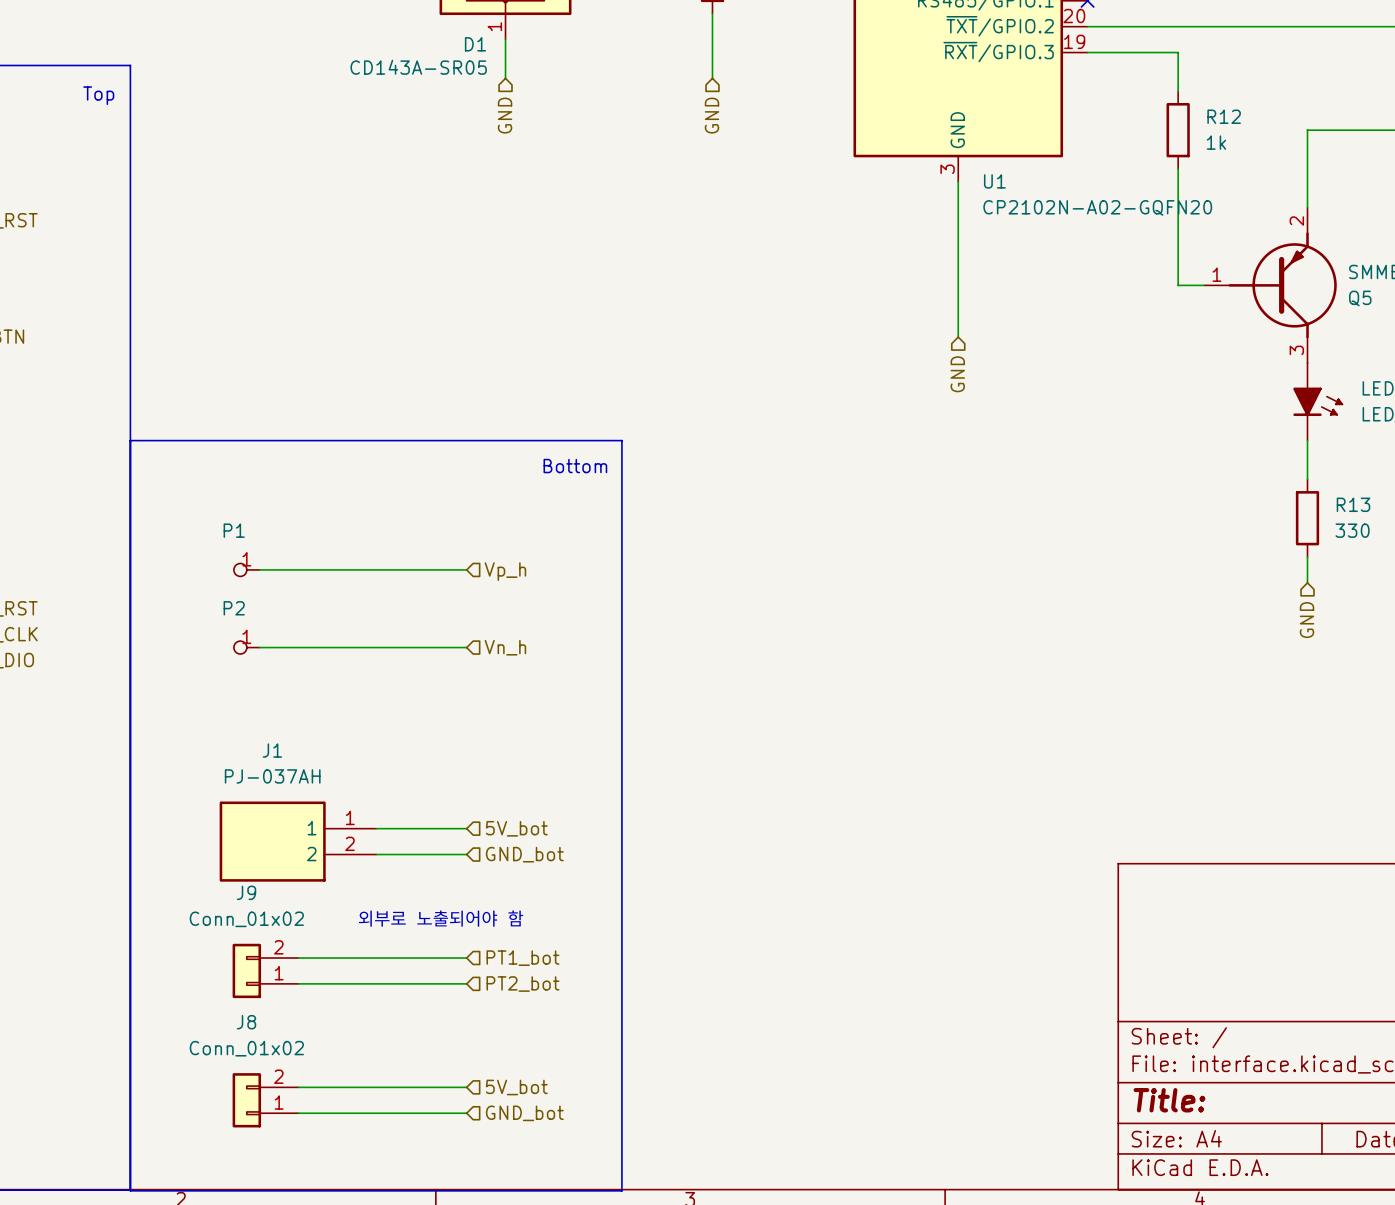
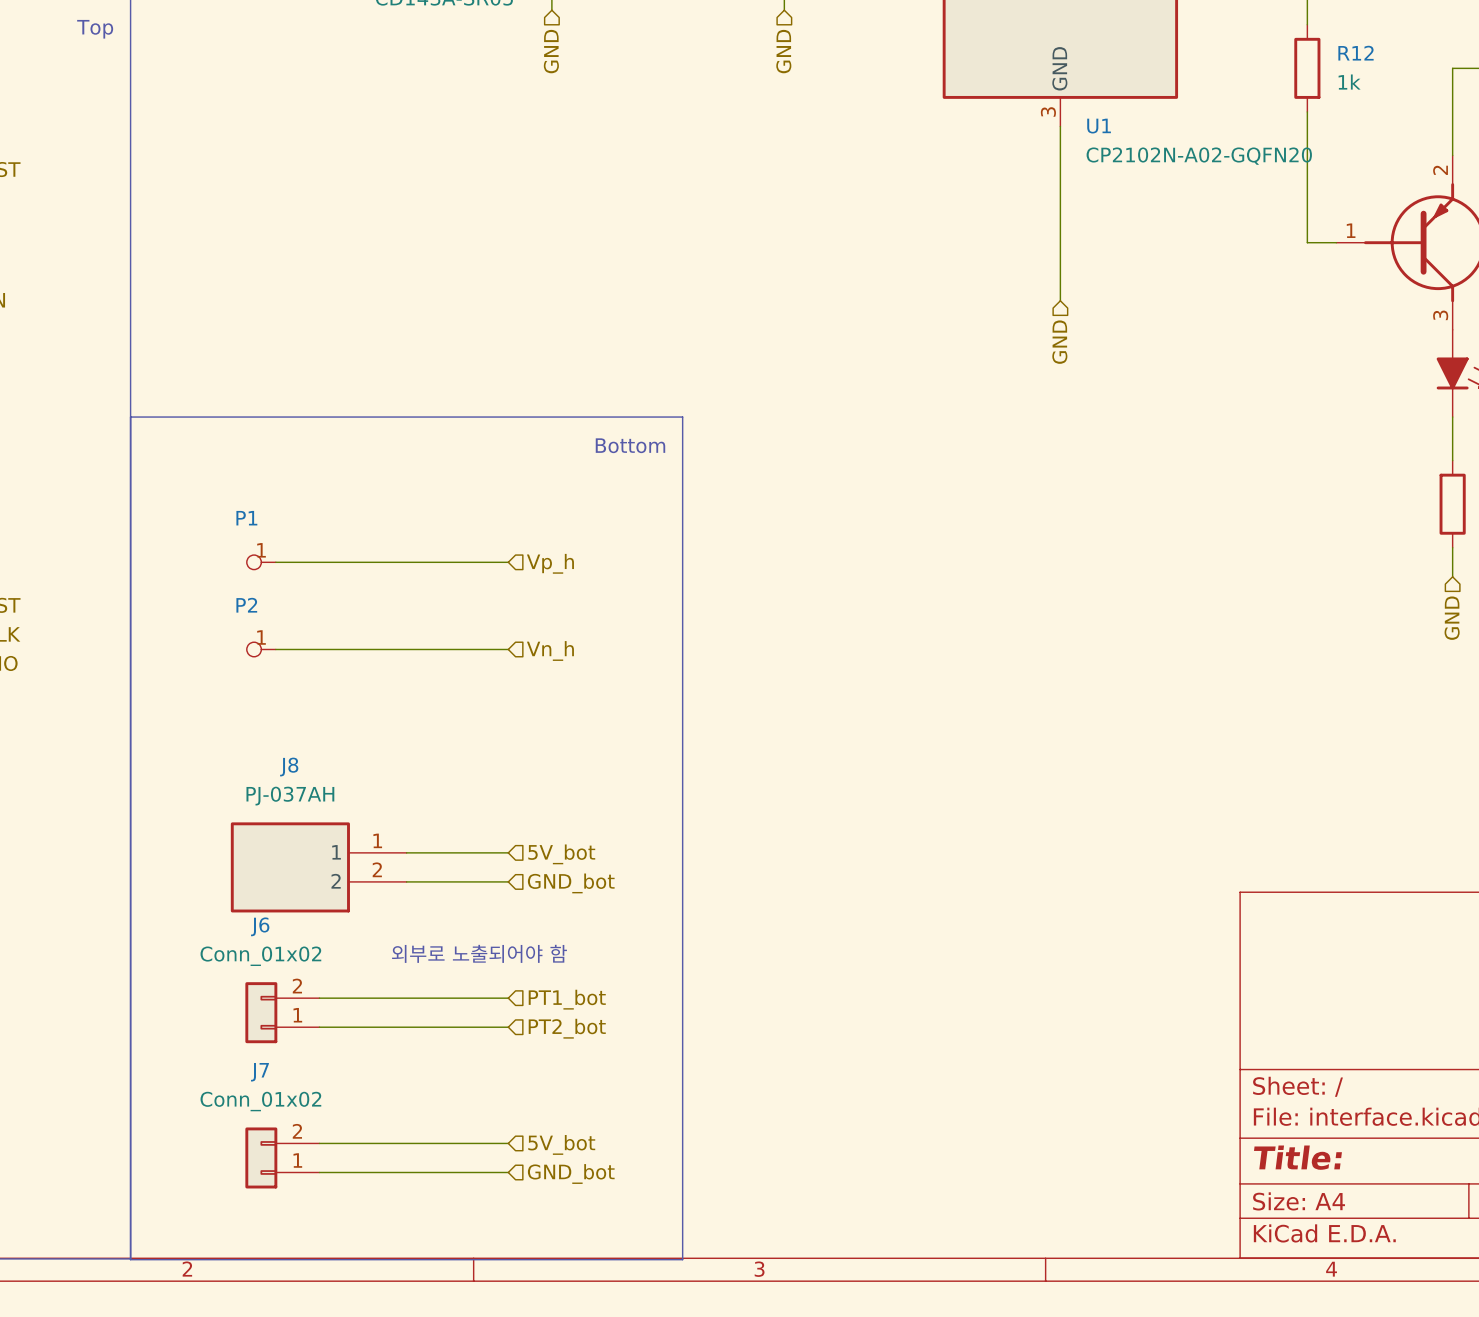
J1 name: J1 (272, 750) -> J8 (289, 767)
J9 name: J9 (246, 892) -> J6 (260, 926)
J8 name: J8 (246, 1022) -> J7 (259, 1072)

